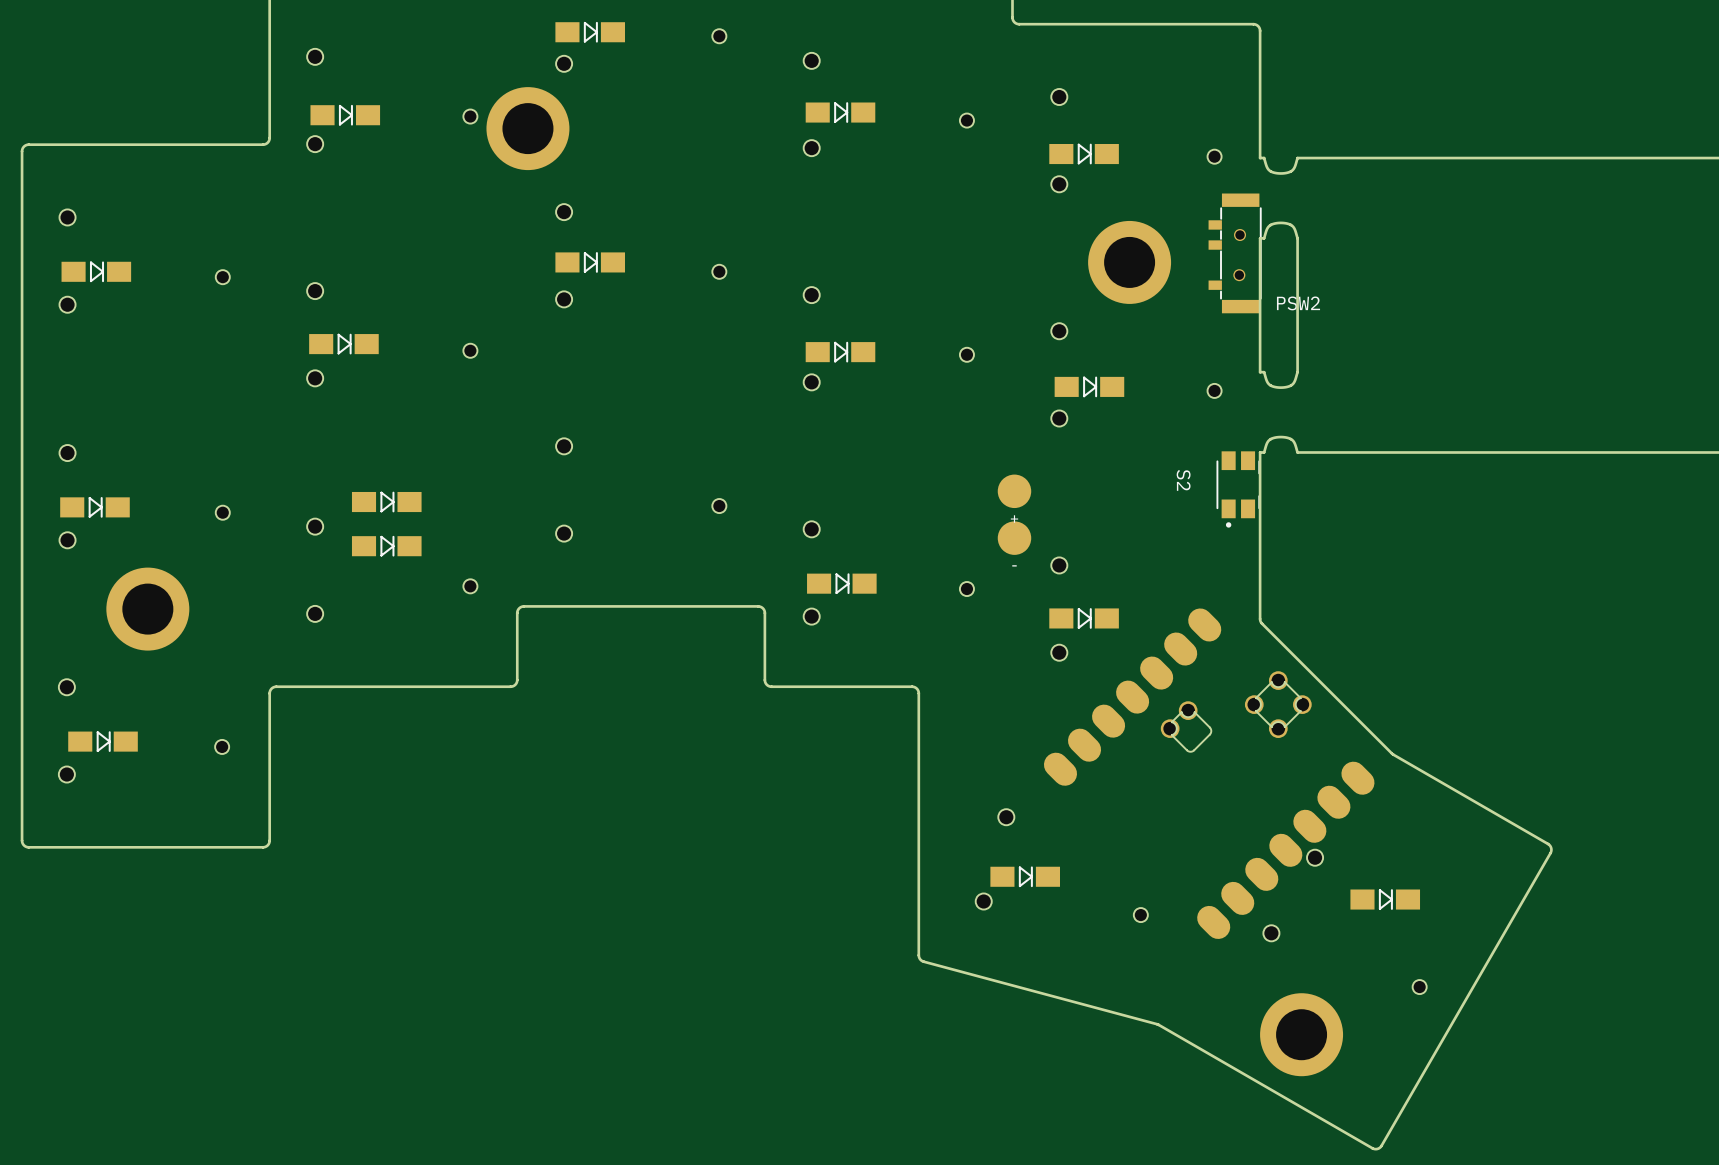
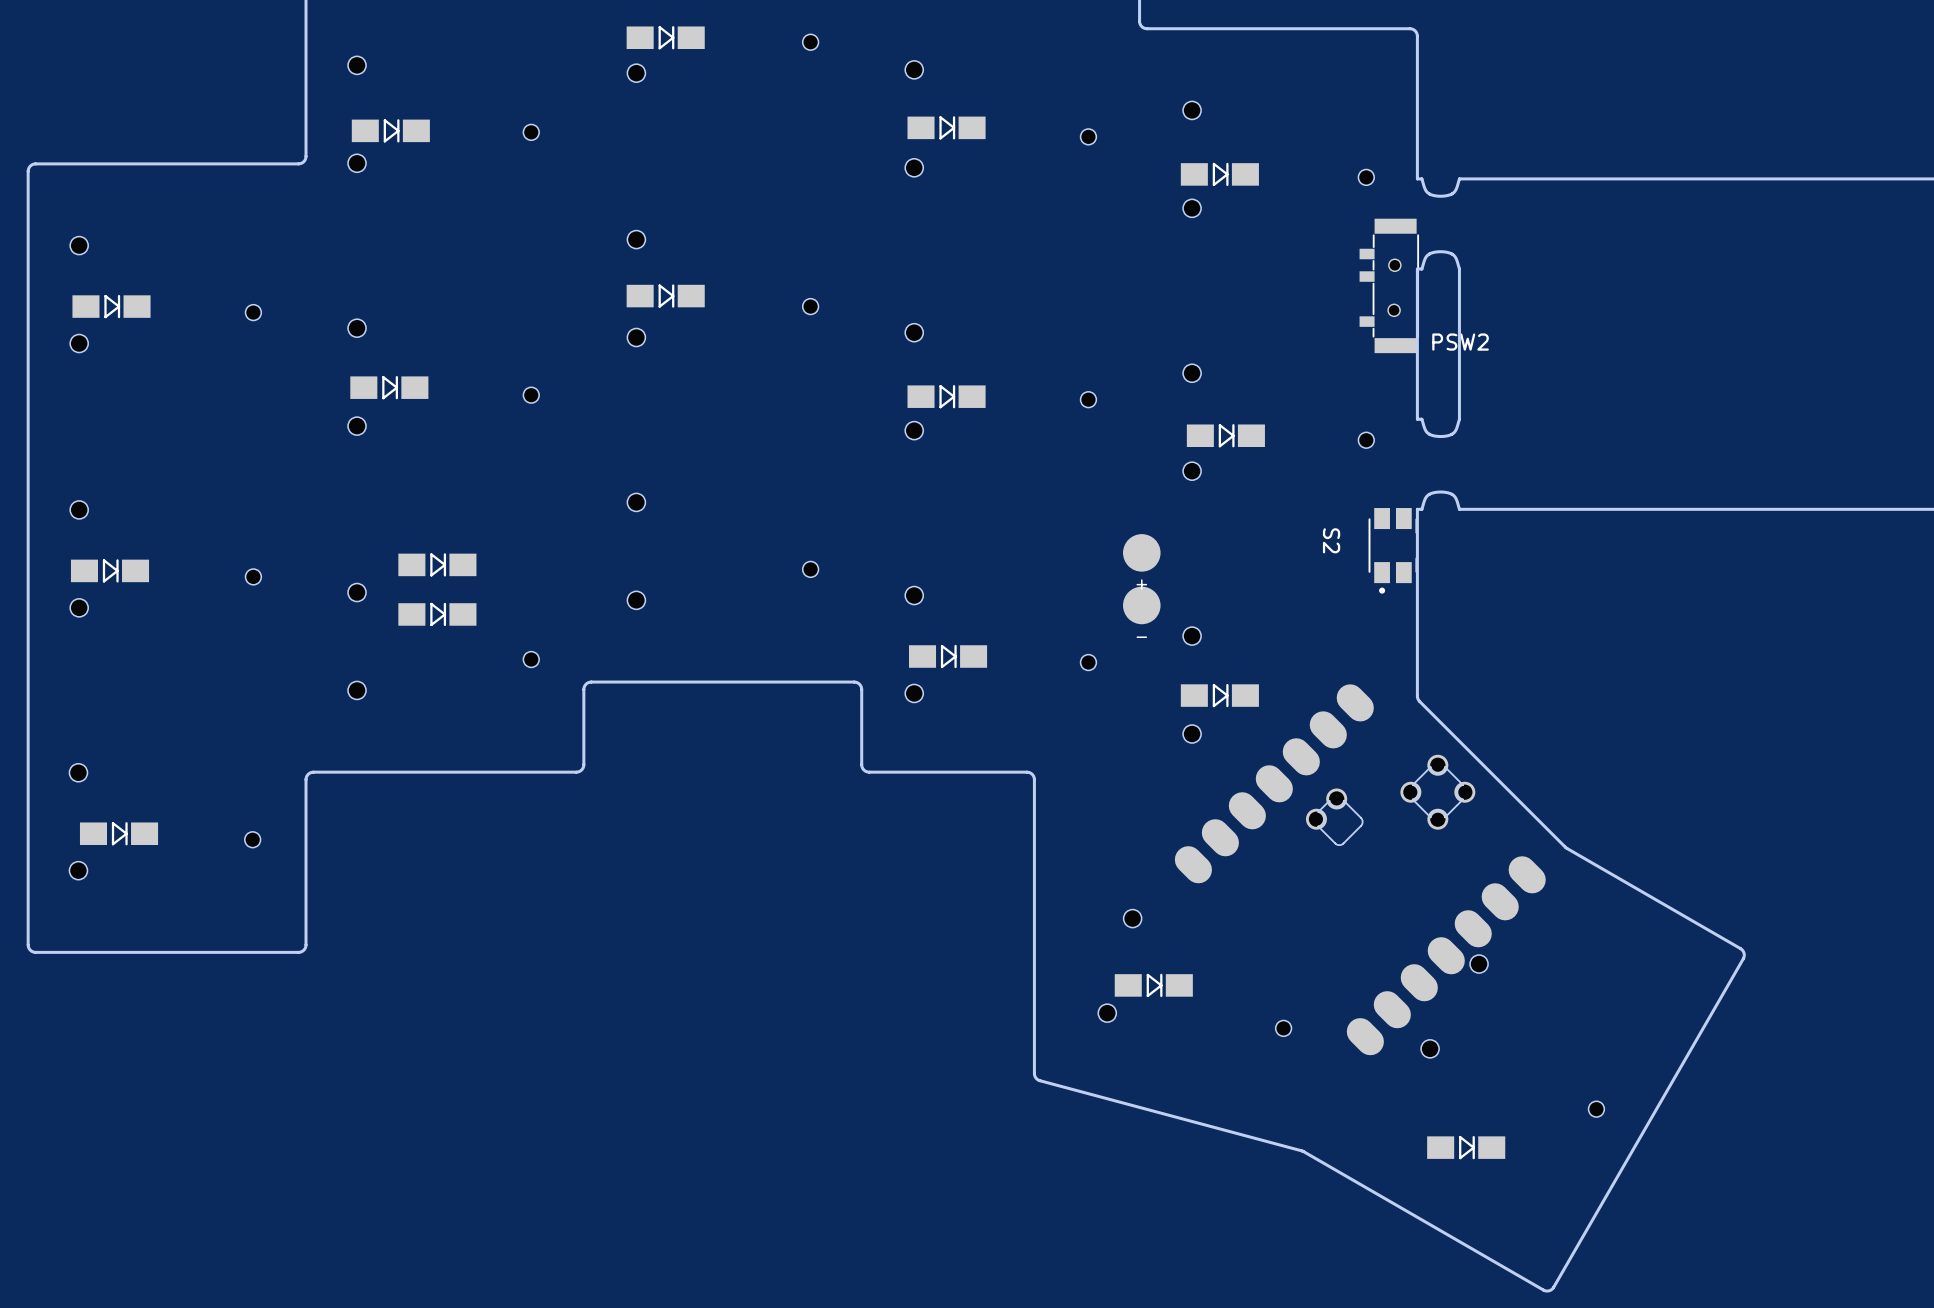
part: (527, 128) -> none
part: (1129, 262) -> none
part: (147, 609) -> none
part position: (1385, 899) -> (1466, 1147)
part: (1301, 1034) -> none

